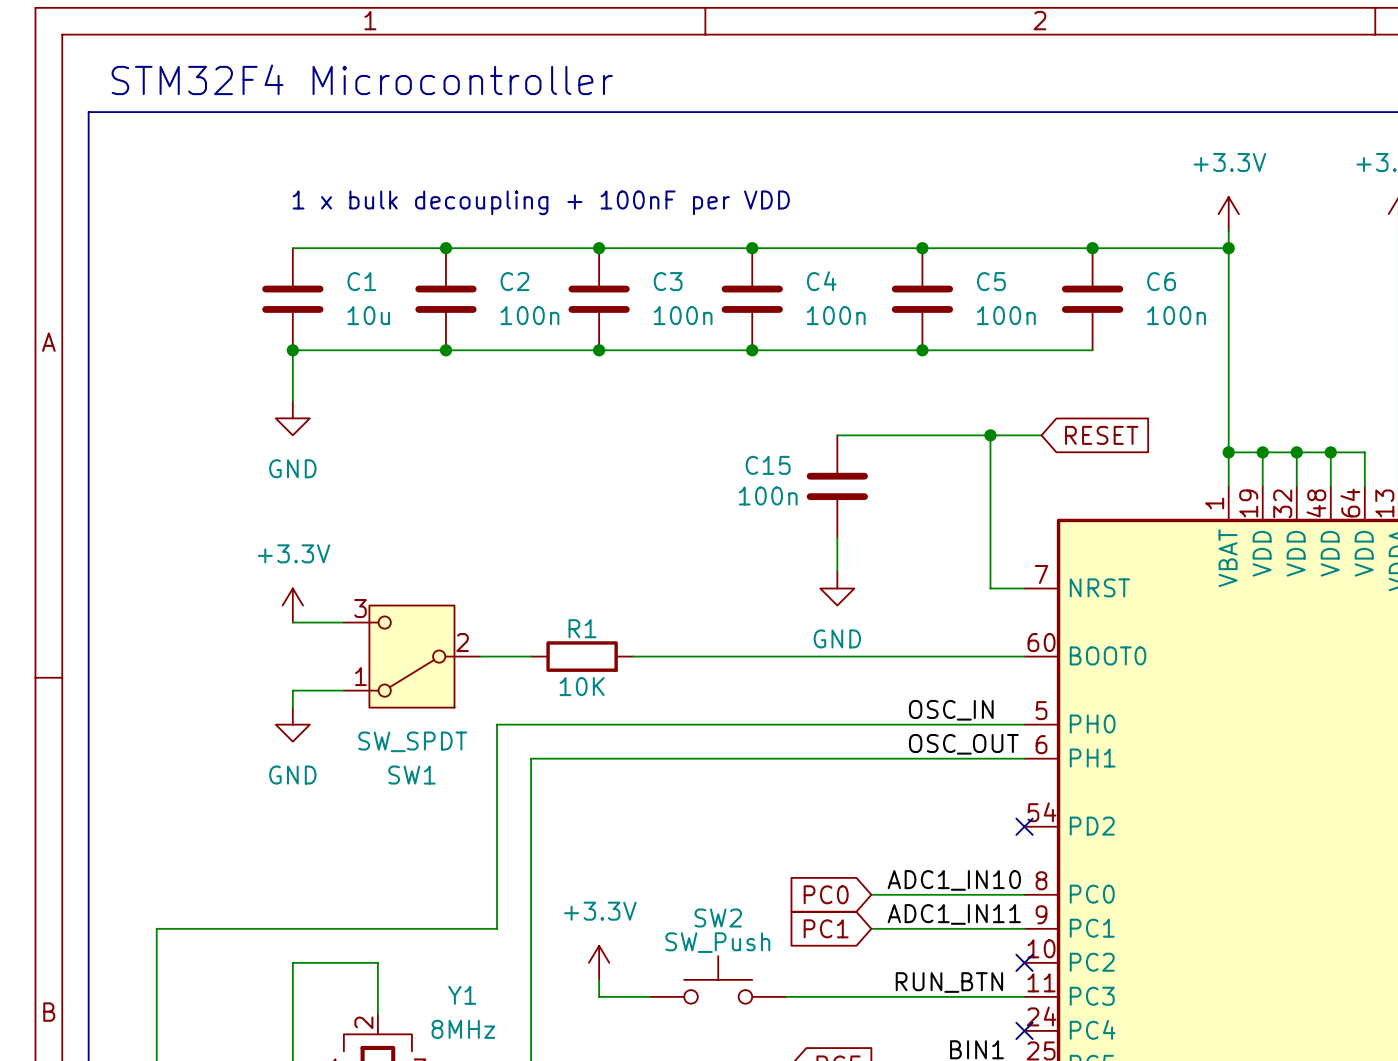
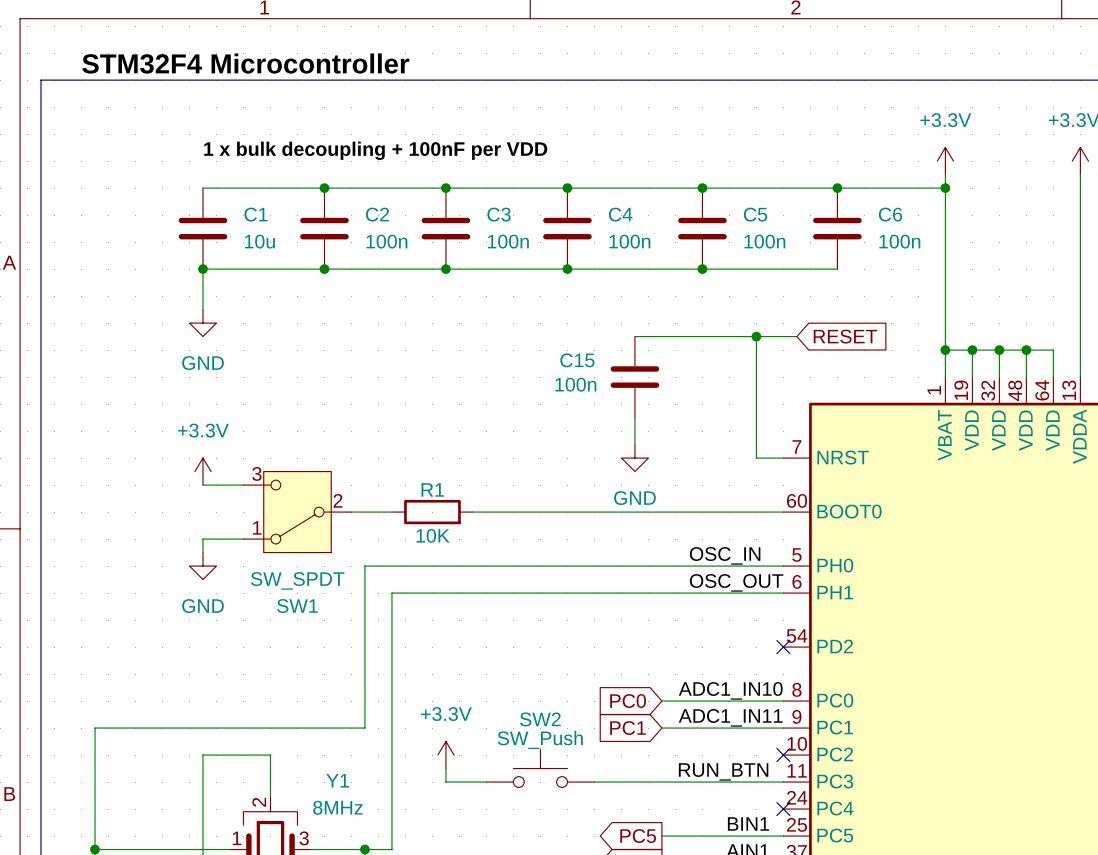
text: STM32F4 Microcontroller (362, 79) -> none
label: none -> STM32F4 Microcontroller (245, 63)
label: none -> 1 x bulk decoupling + 100nF per VDD (375, 150)
text: 1 x bulk decoupling + 100nF per VDD (541, 202) -> none

